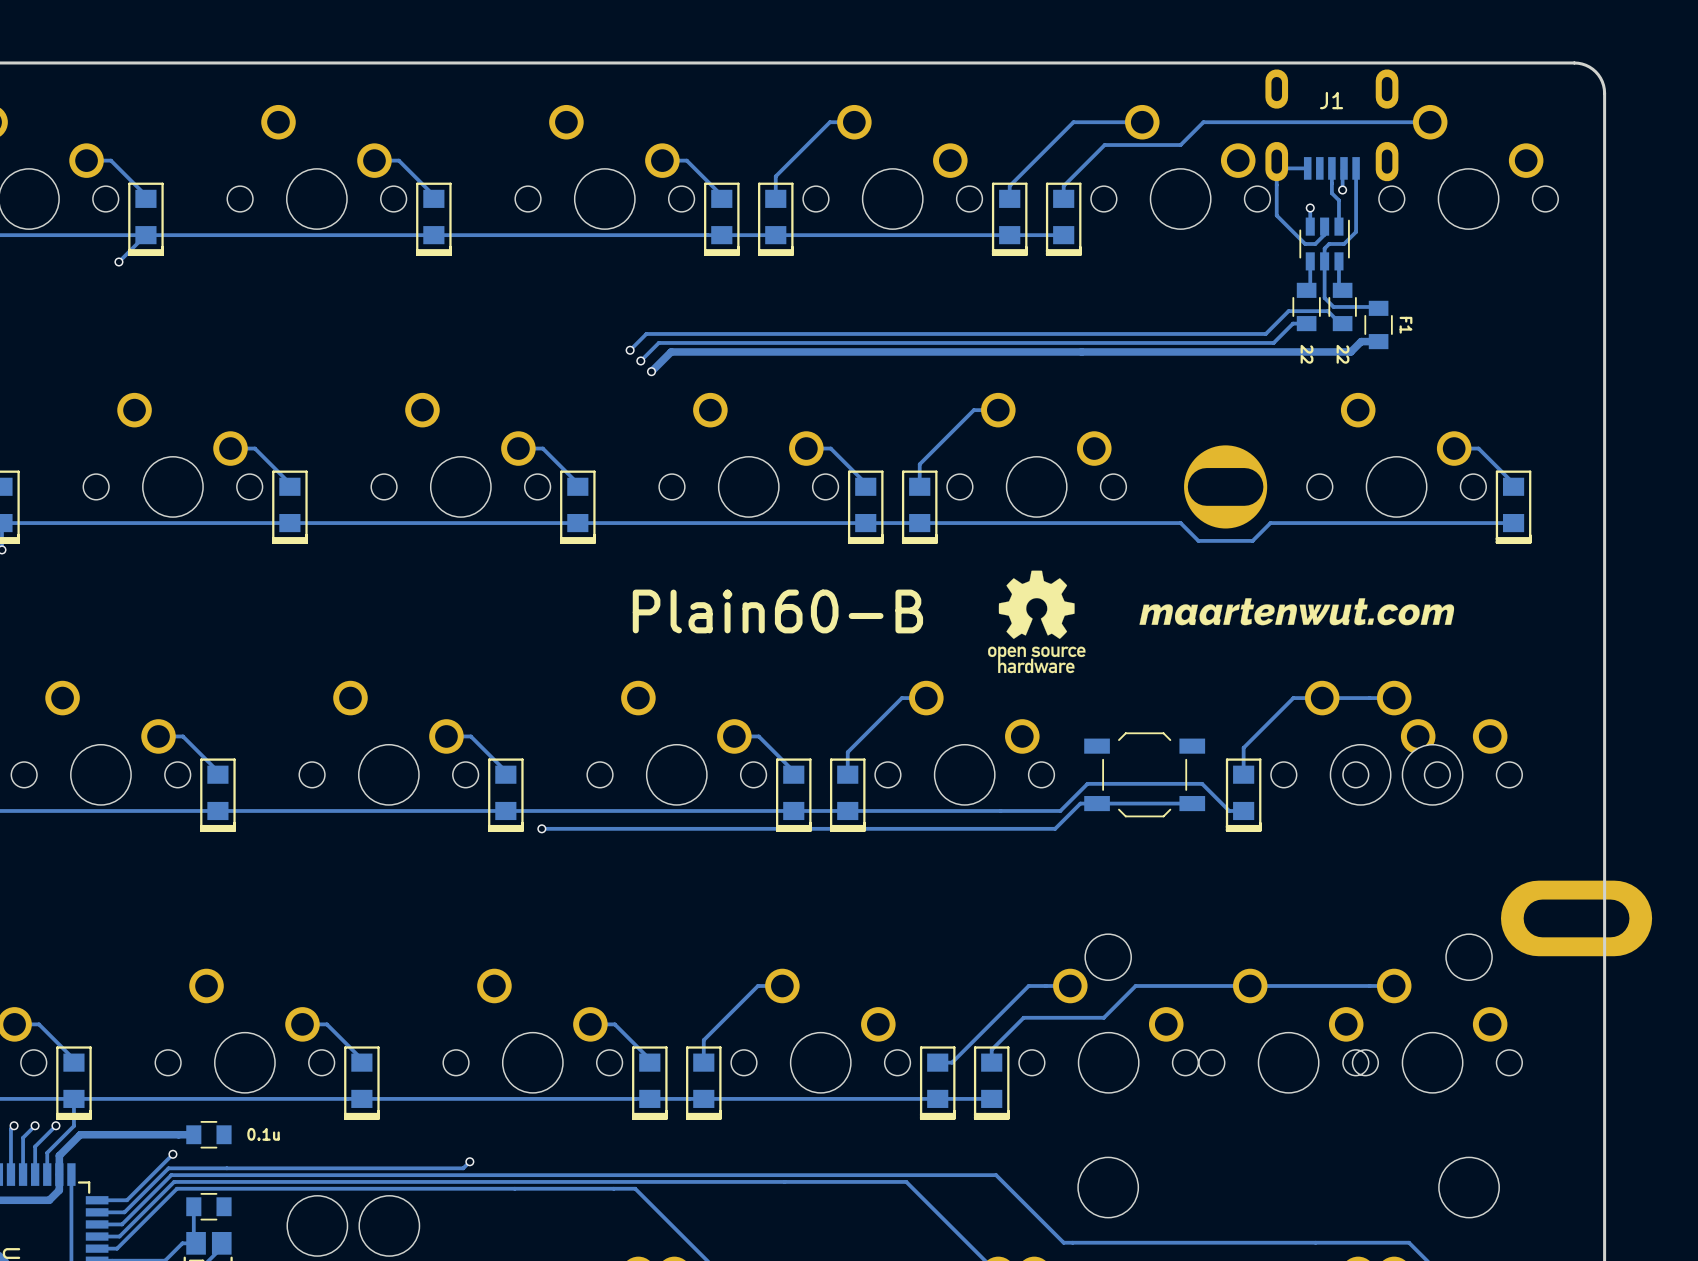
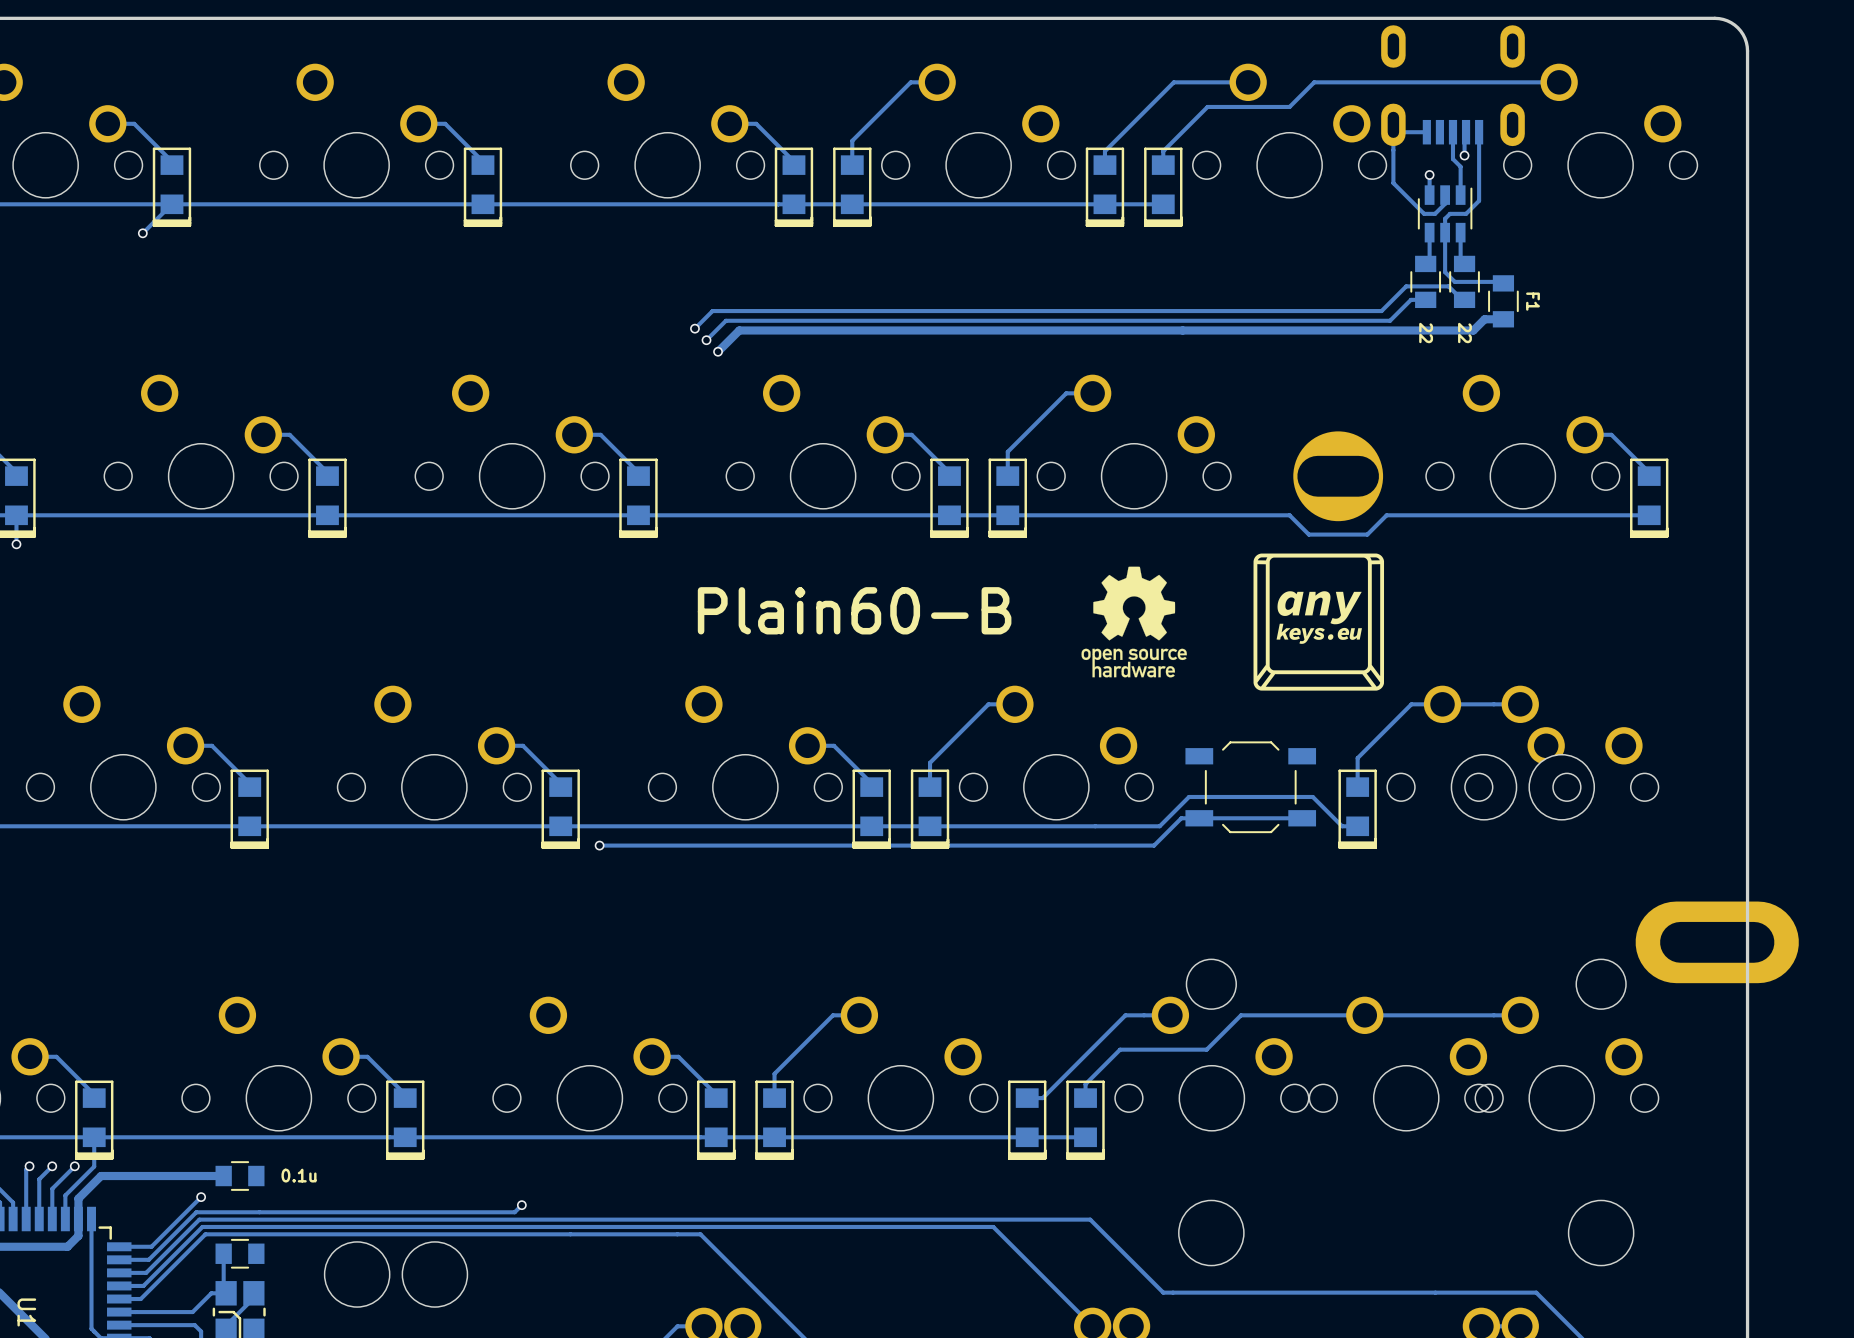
J1 name: J1 (1331, 100) -> none
drawing: none -> [1253, 553, 1385, 691]
drawing: [1139, 598, 1455, 626] -> none

